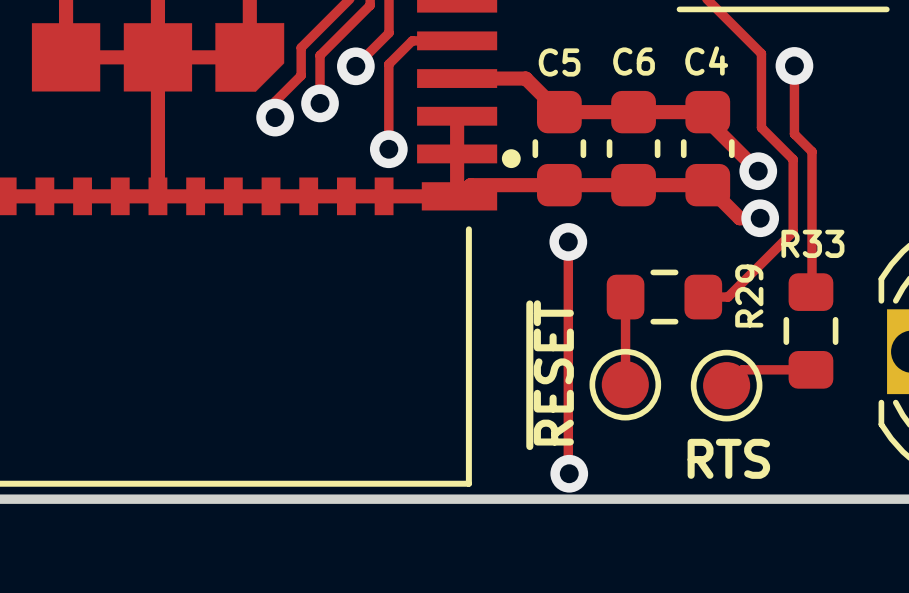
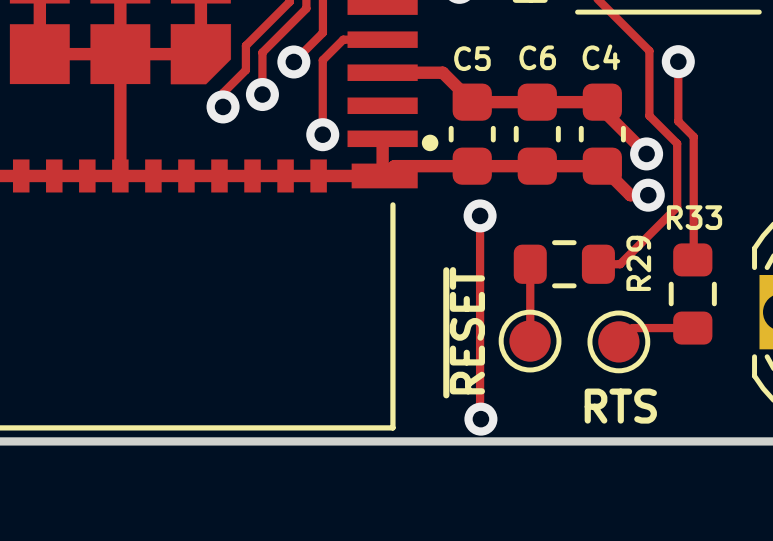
track: (457, 116) (457, 153) -> none

